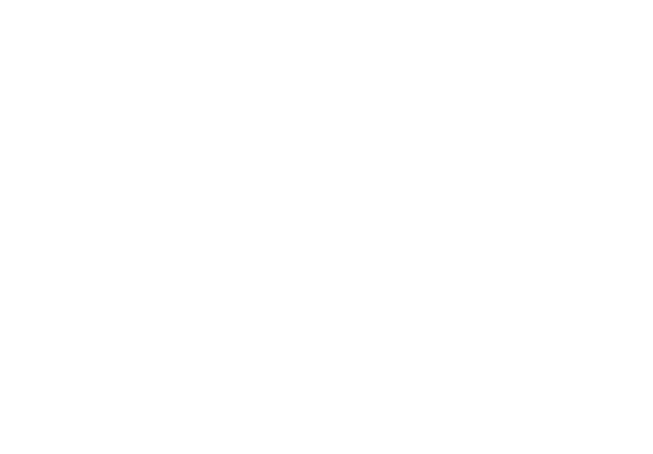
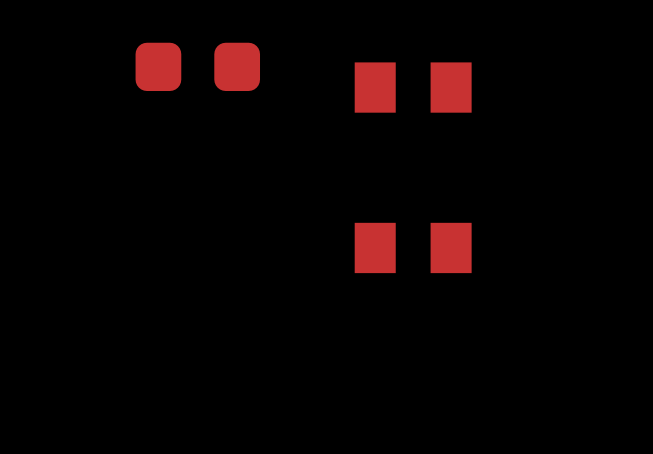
part: none -> (197, 66)
part: none -> (413, 87)
part: none -> (413, 247)

